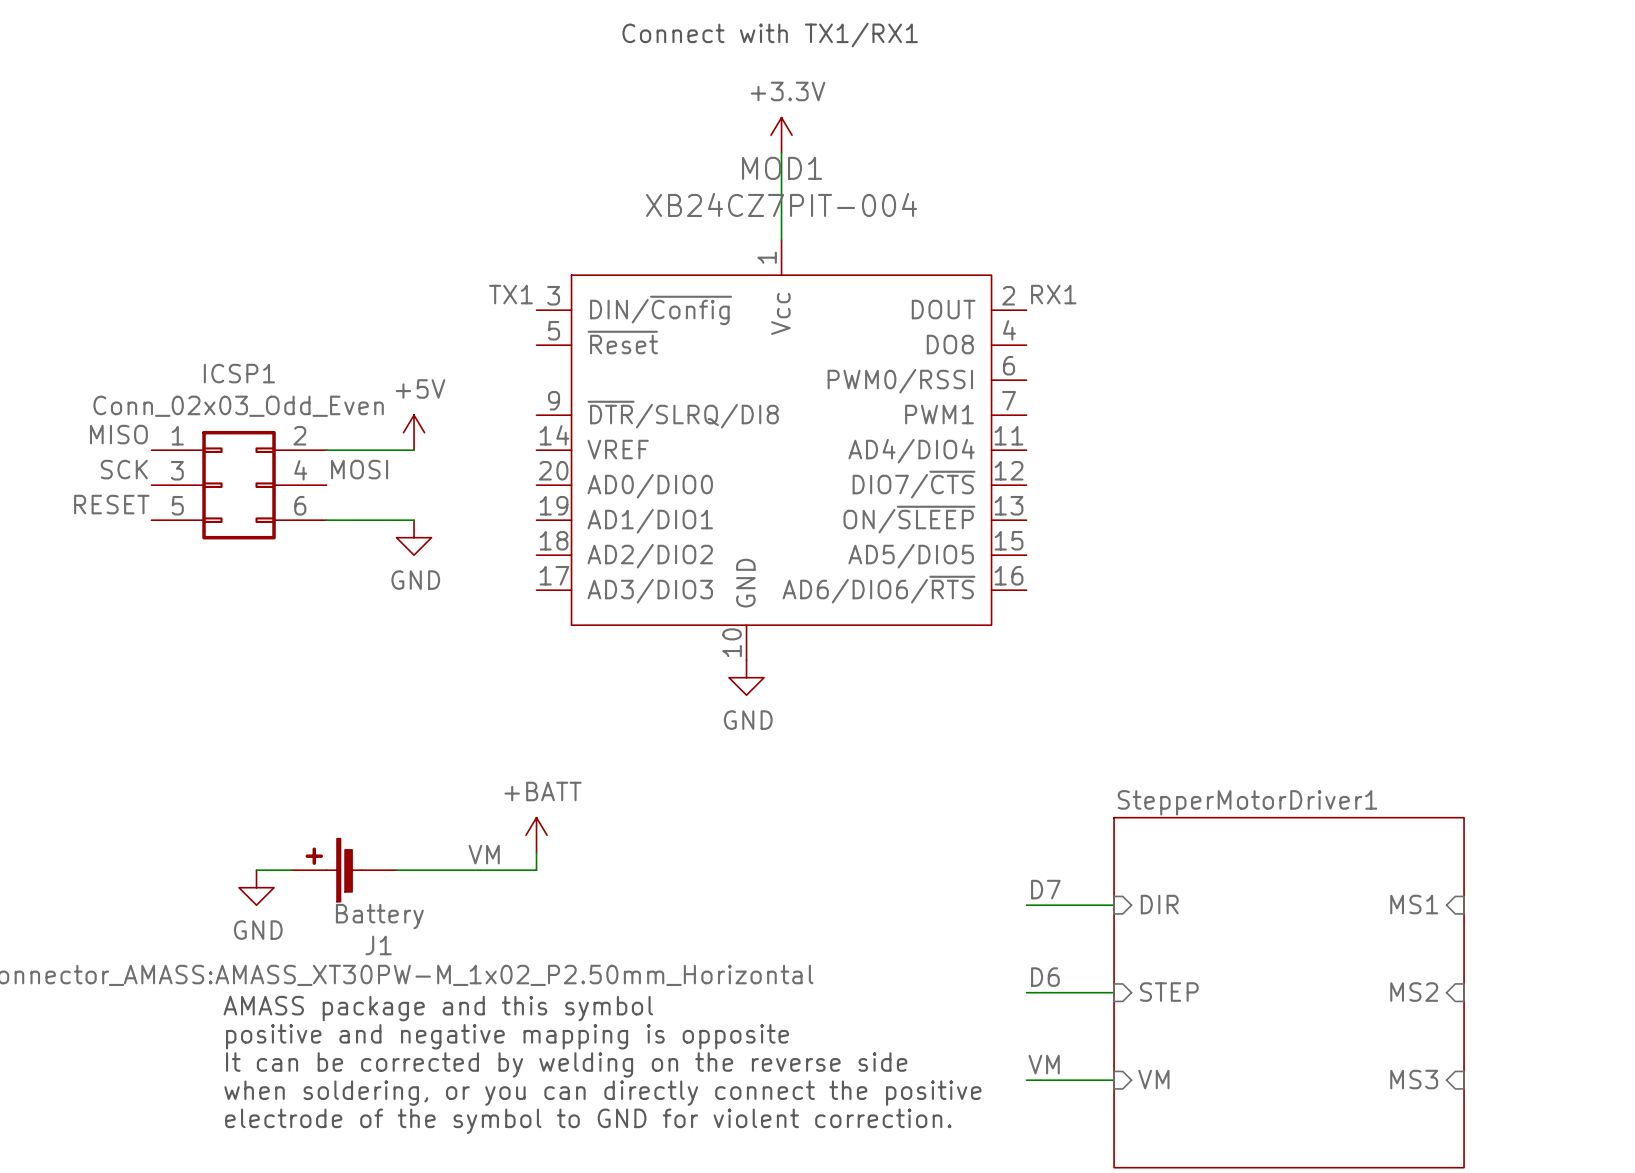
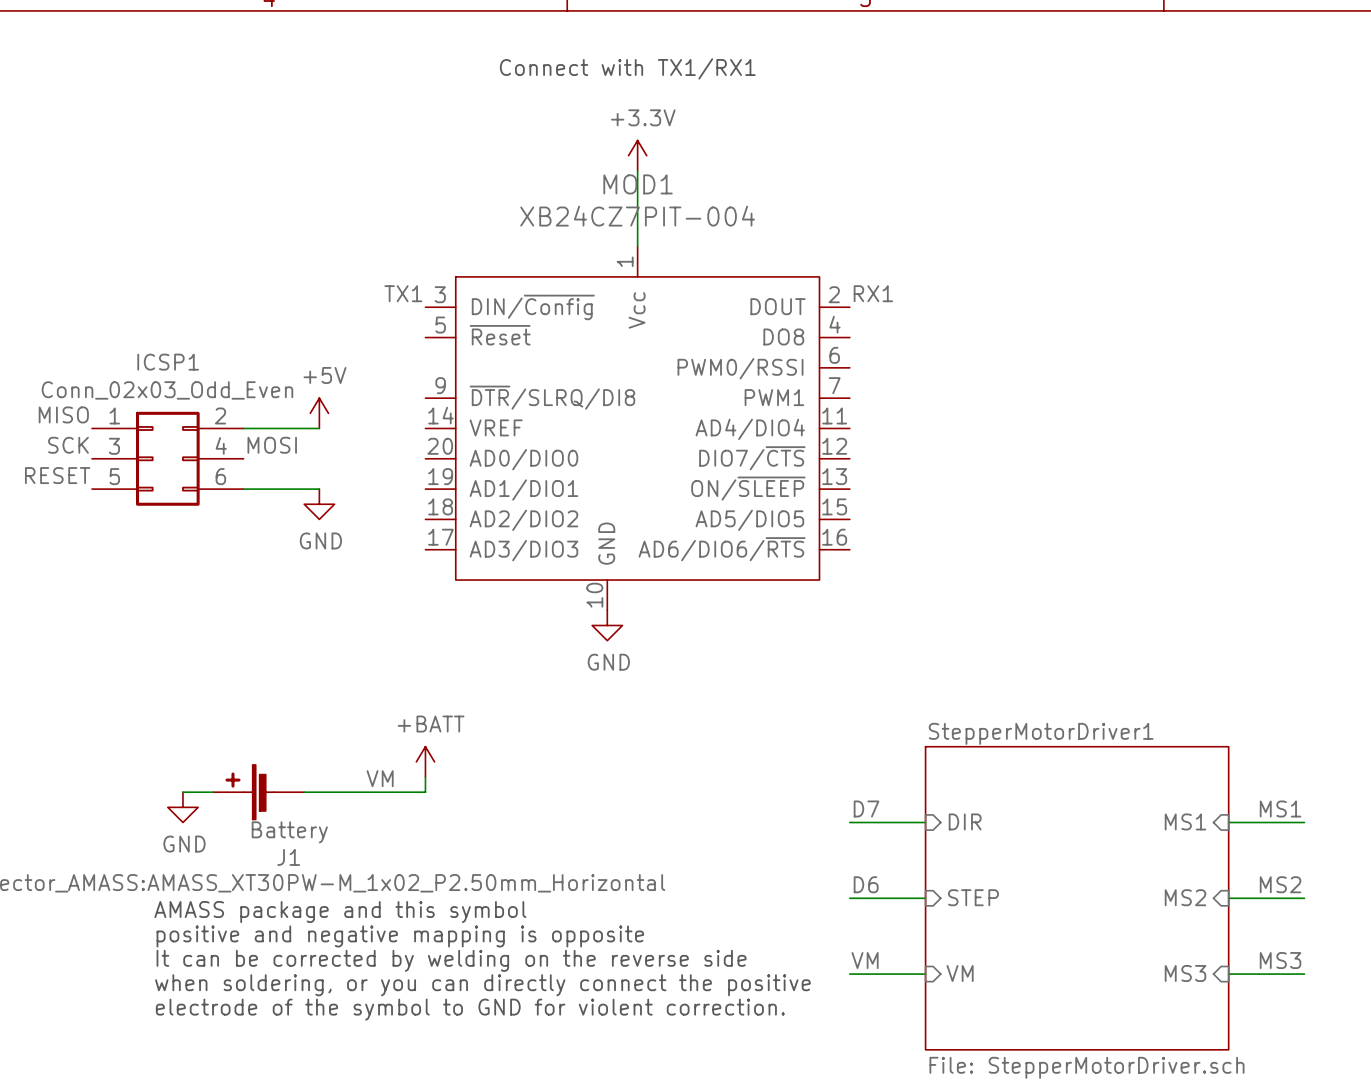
label: none -> MS1 (1280, 808)
wire: none -> (1228, 822) (1304, 822)
label: none -> MS2 (1280, 884)
wire: none -> (1228, 898) (1304, 898)
label: none -> MS3 (1280, 960)
wire: none -> (1228, 974) (1304, 974)

